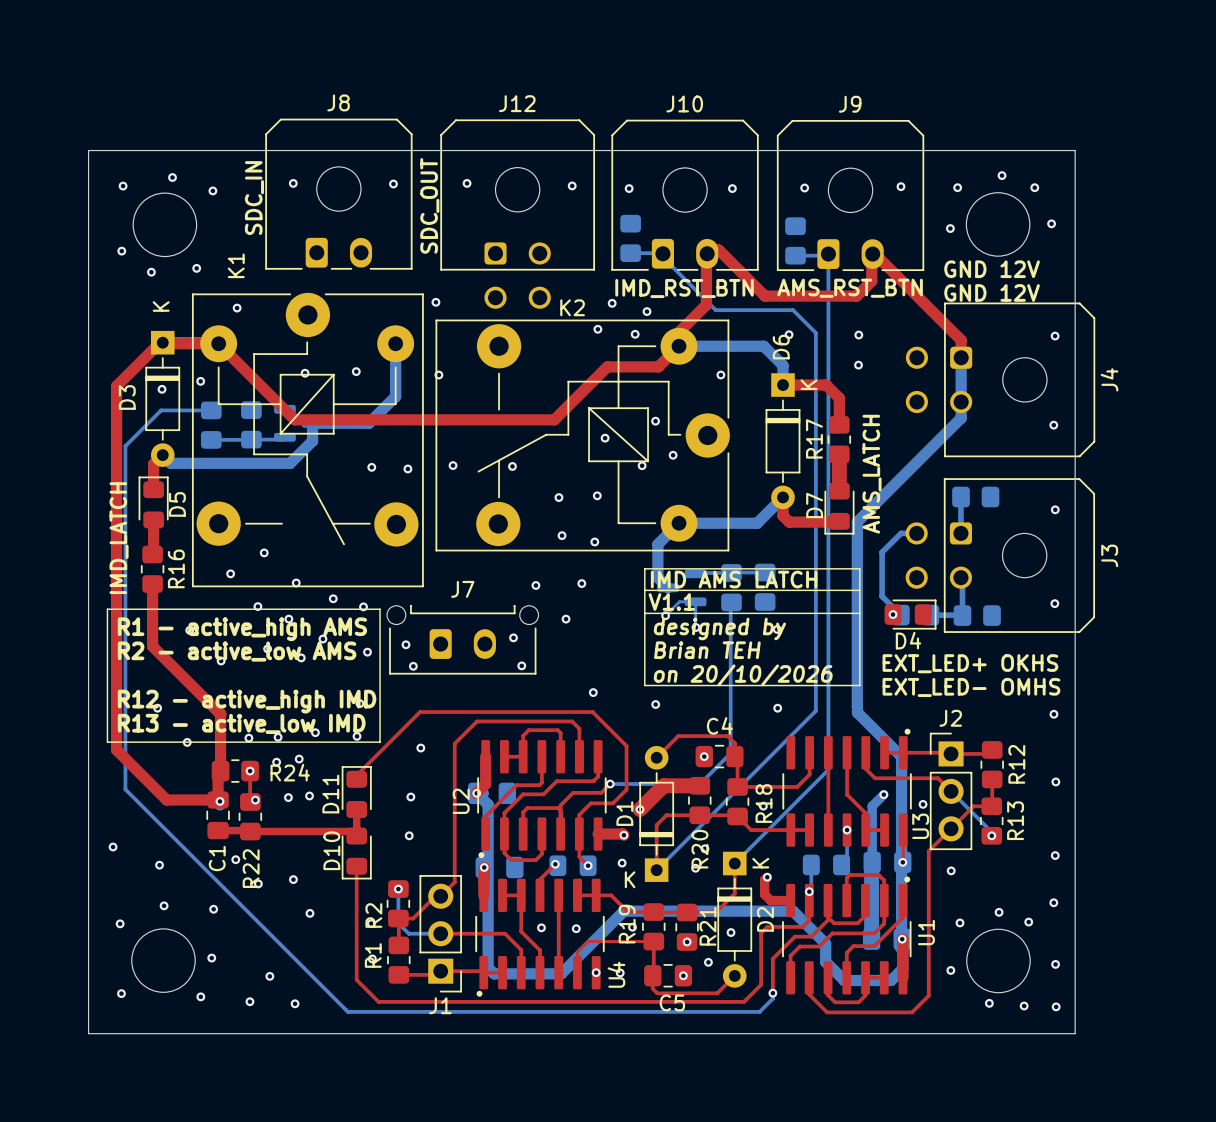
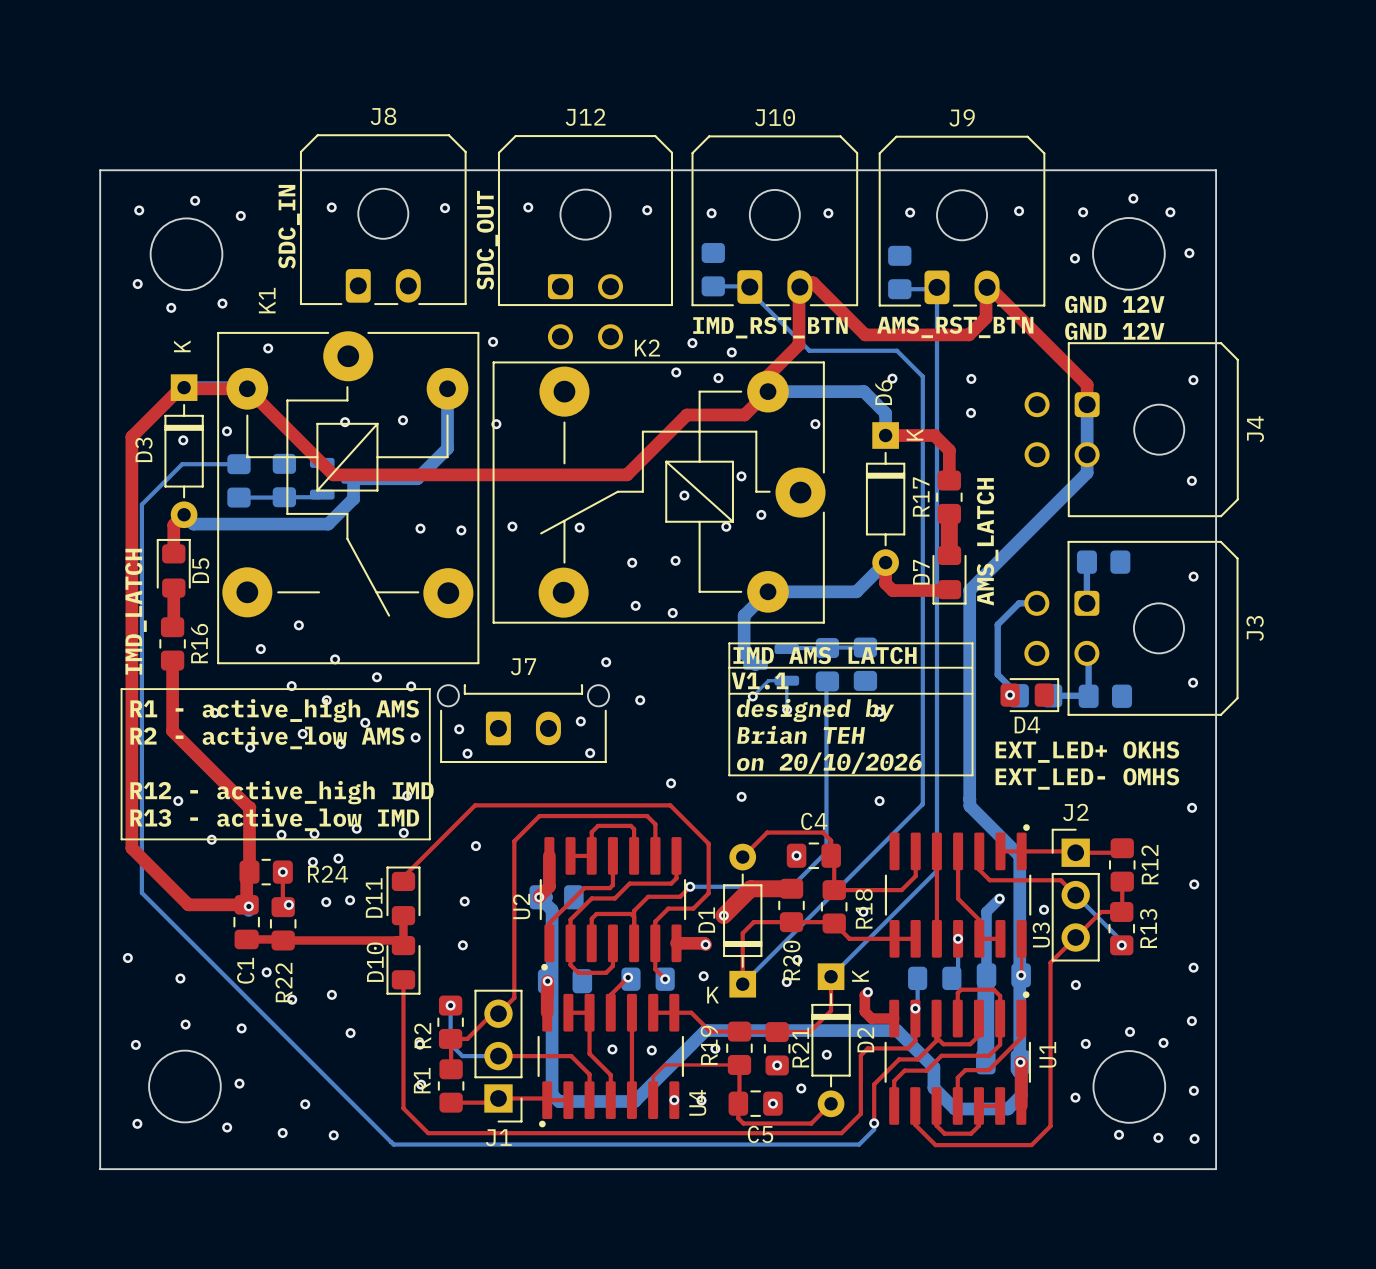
via: (581, 583) -> none

